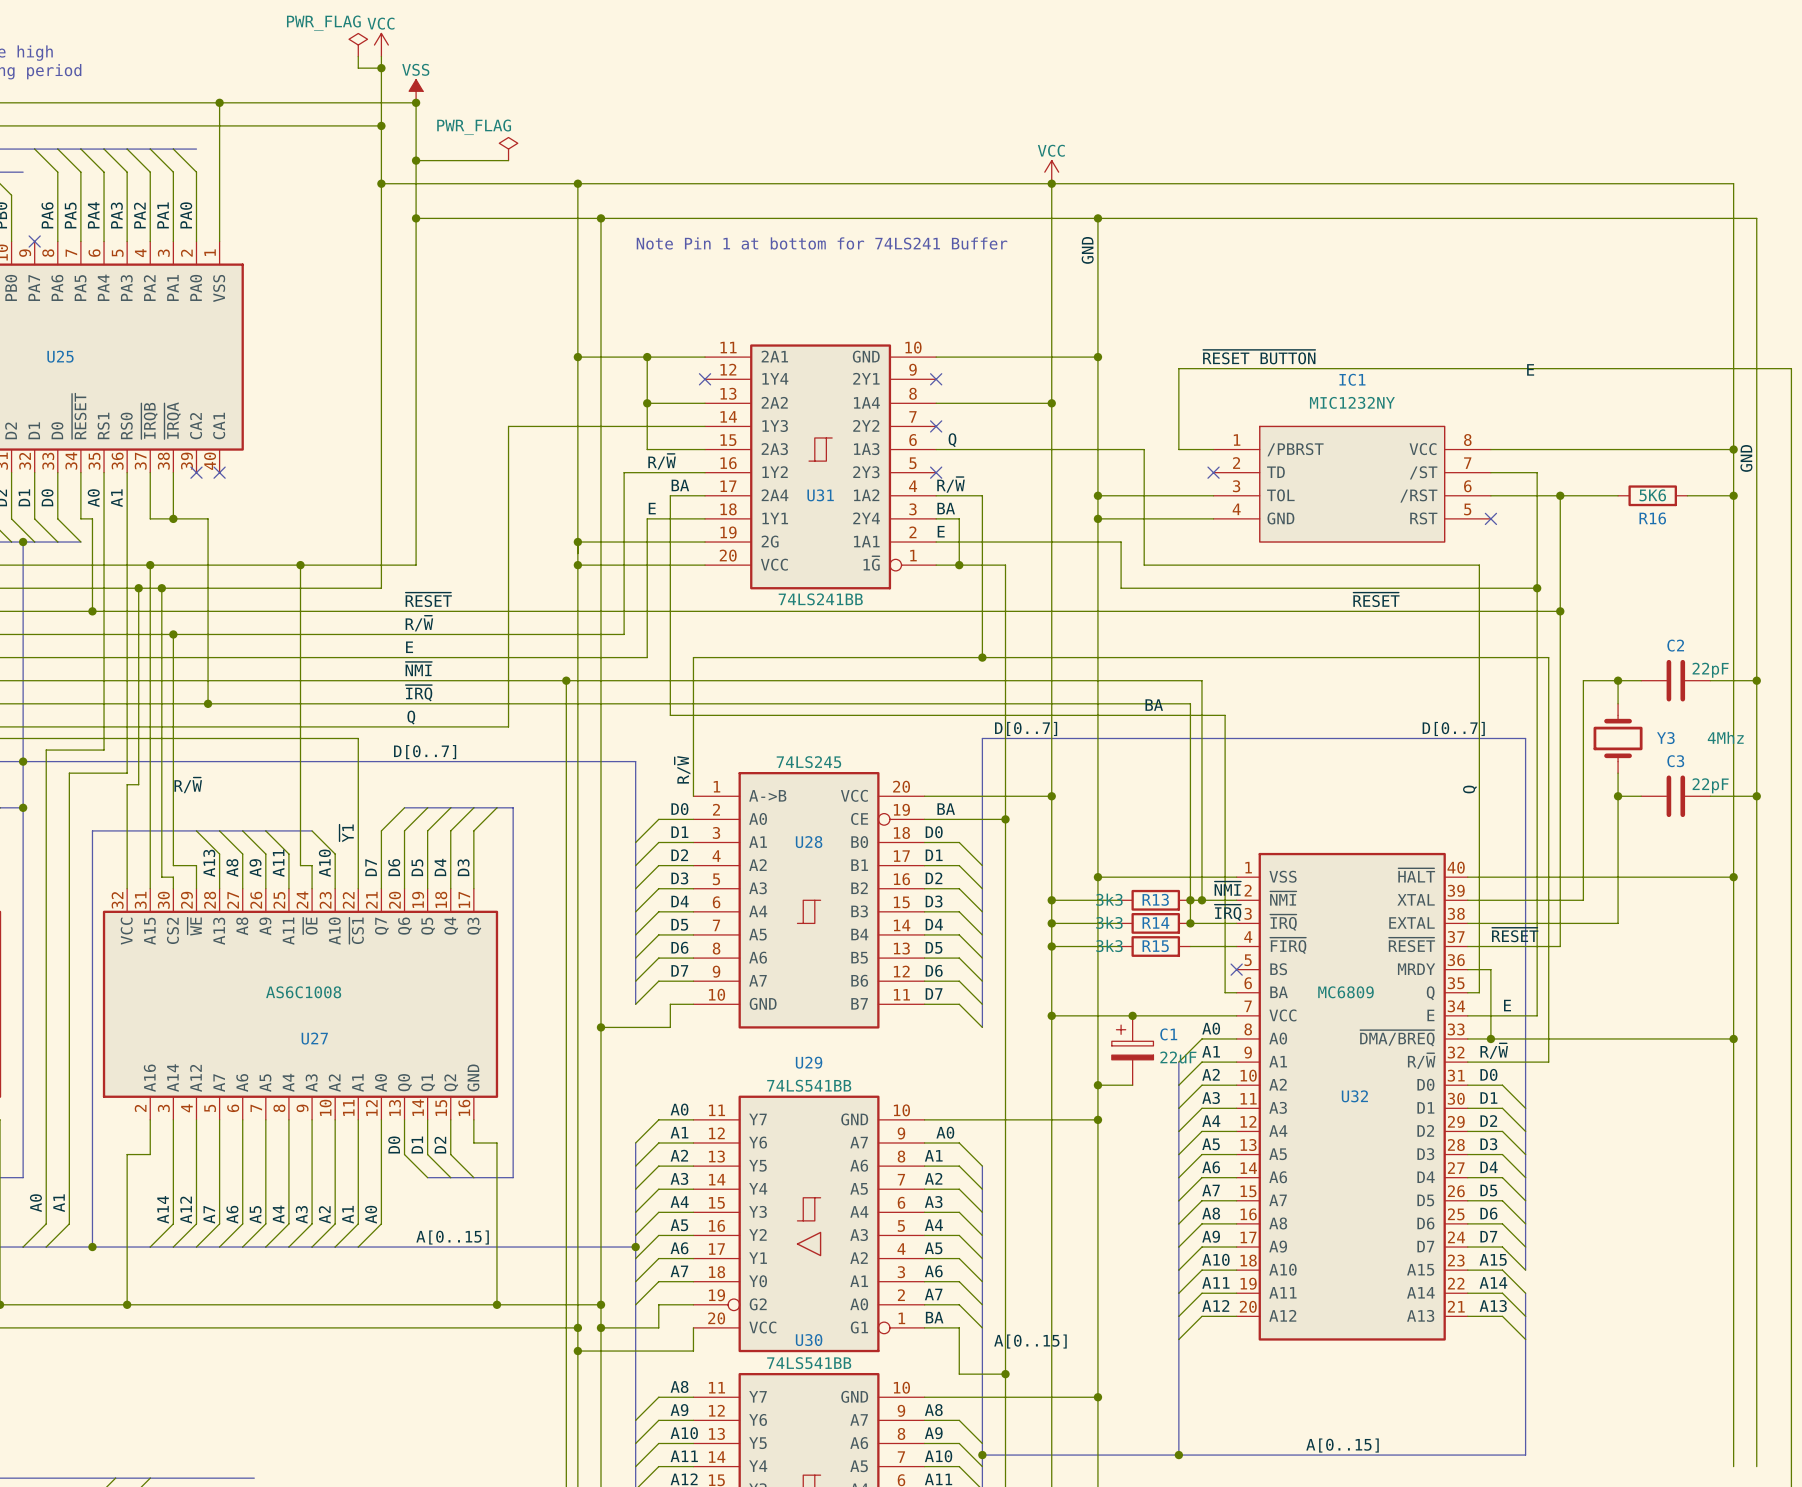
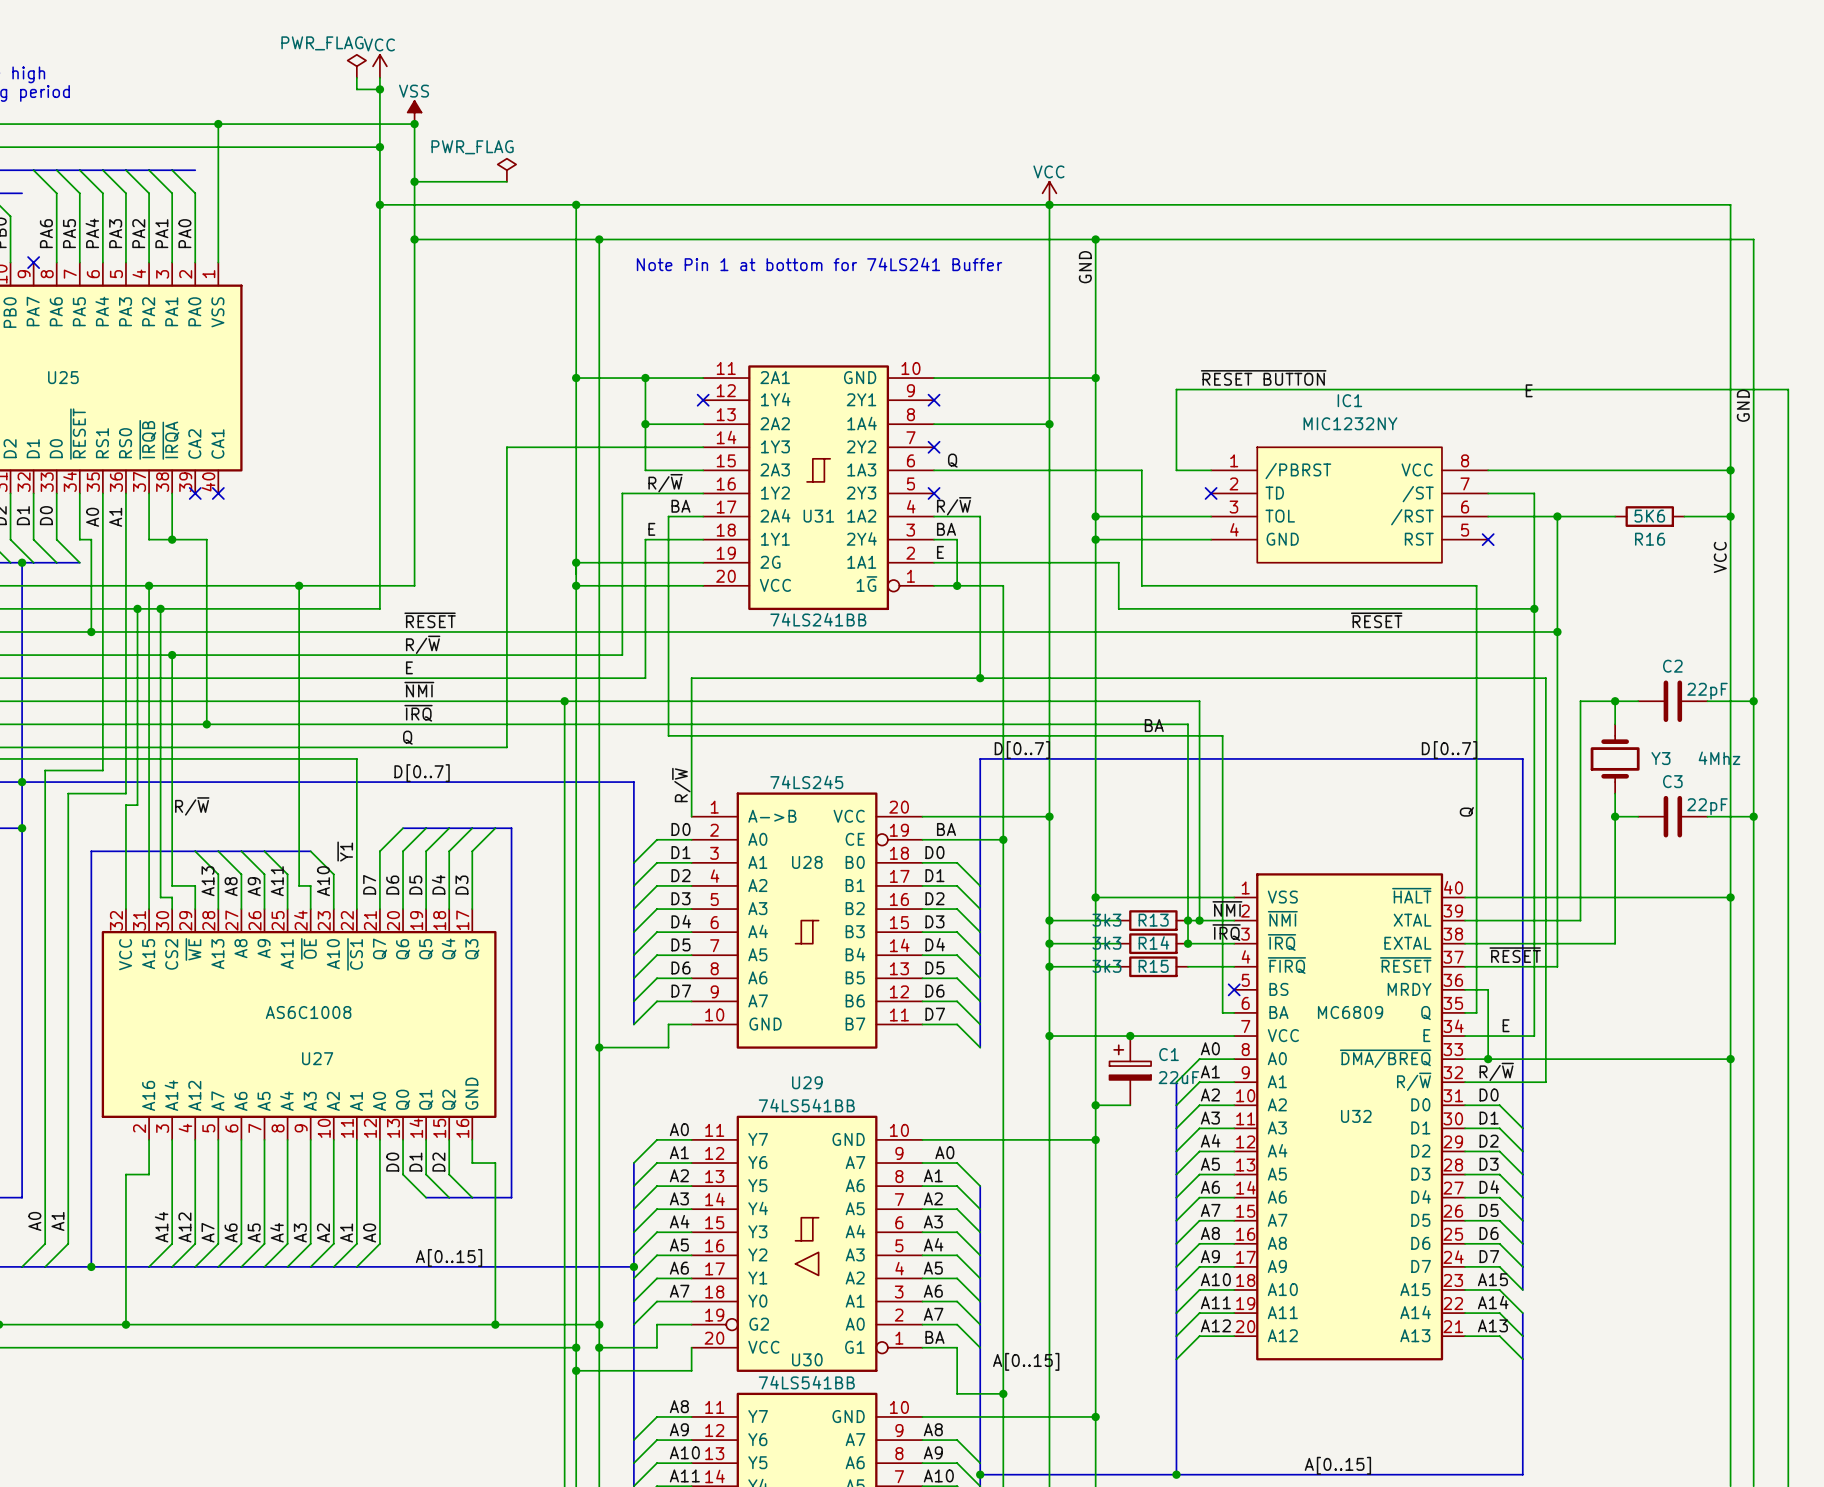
label position: GND (1746, 458) -> GND (1743, 405)
label: none -> VCC (1720, 557)

